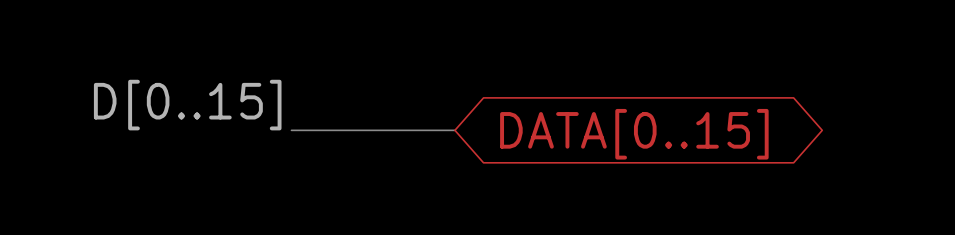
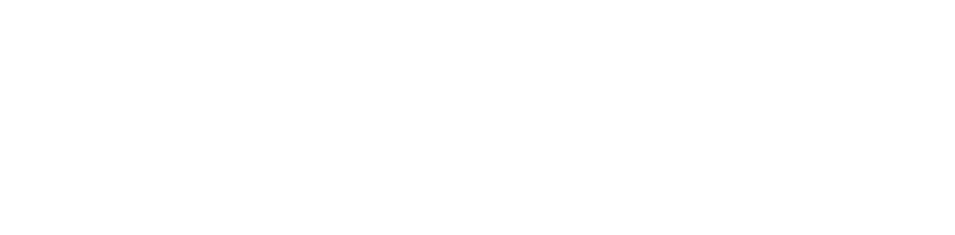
label: D[0..15] (187, 105) -> none
bus: (291, 130) (454, 130) -> none
global label: DATA[0..15] (634, 134) -> none

